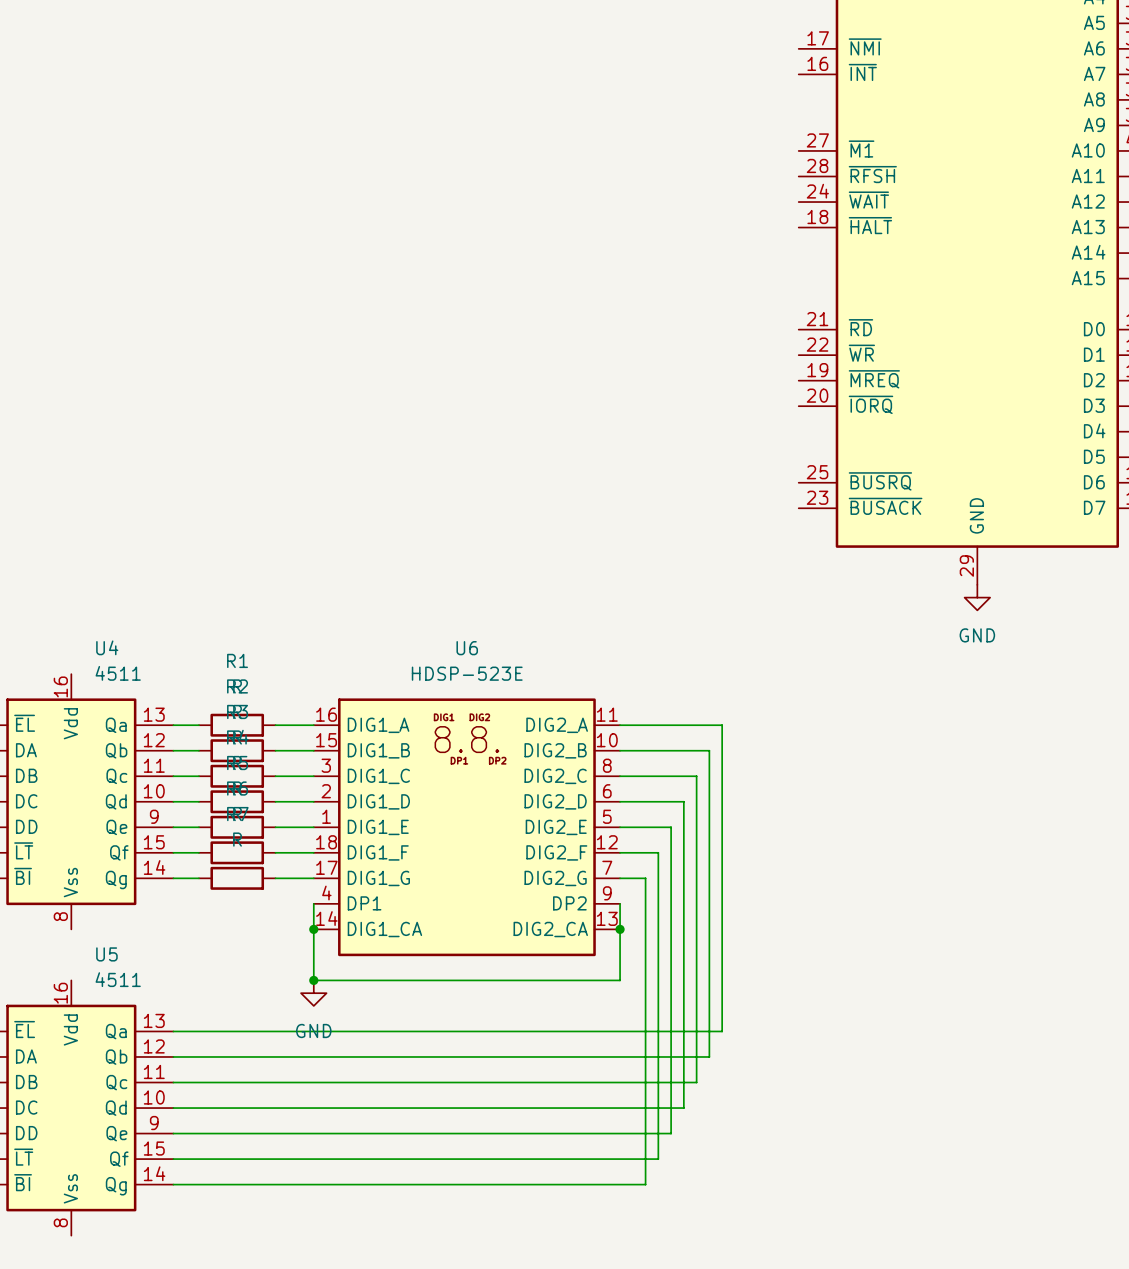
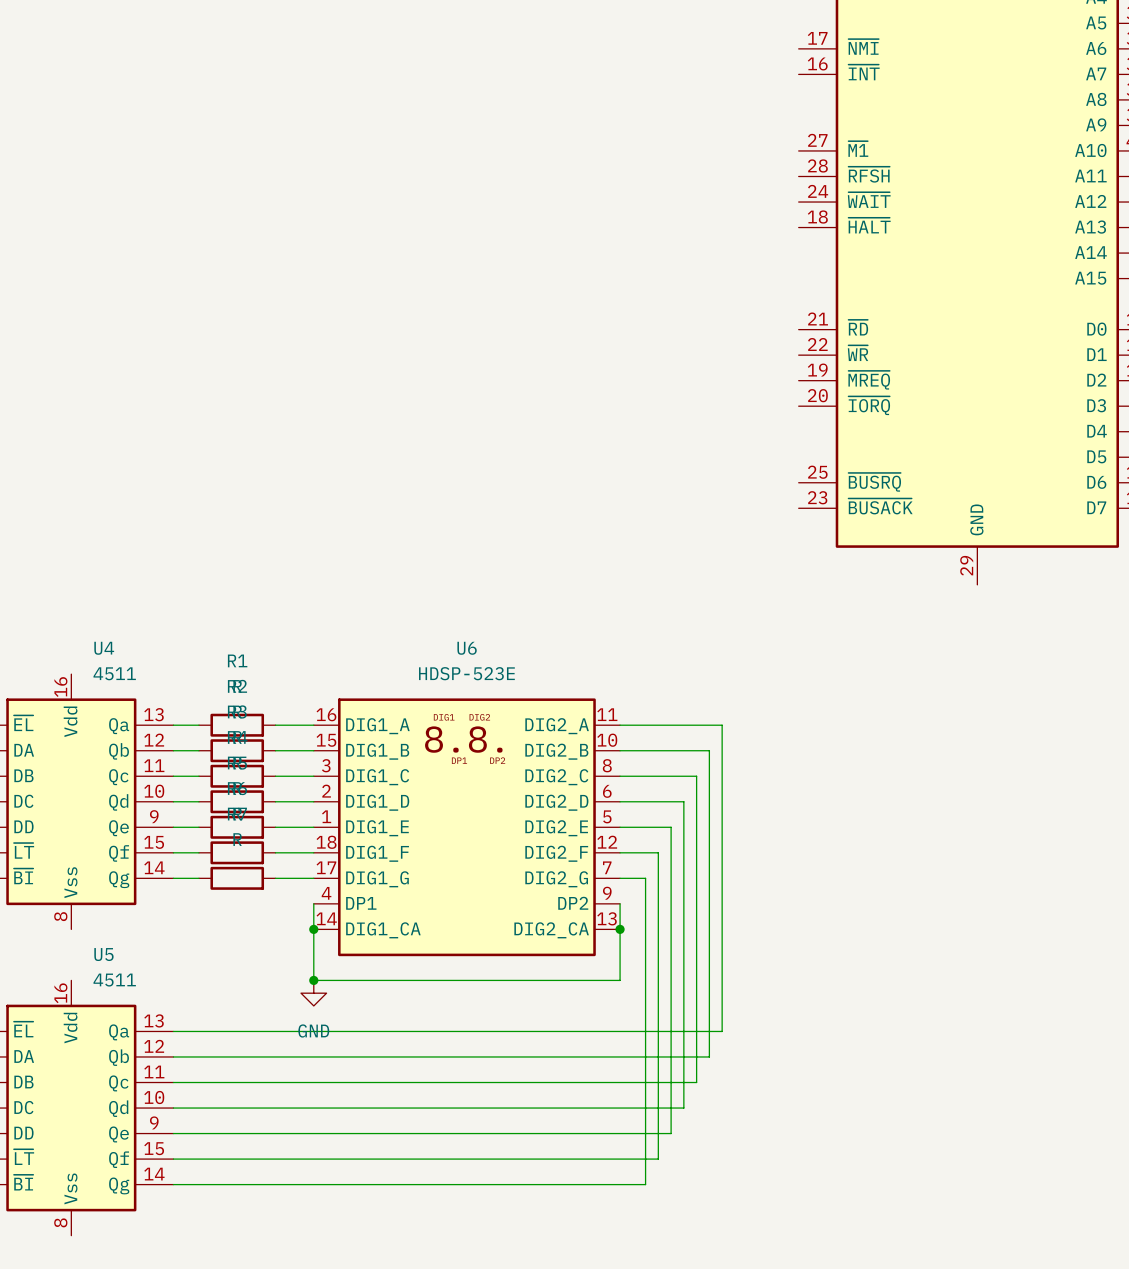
power symbol: GND (977, 597) -> none

